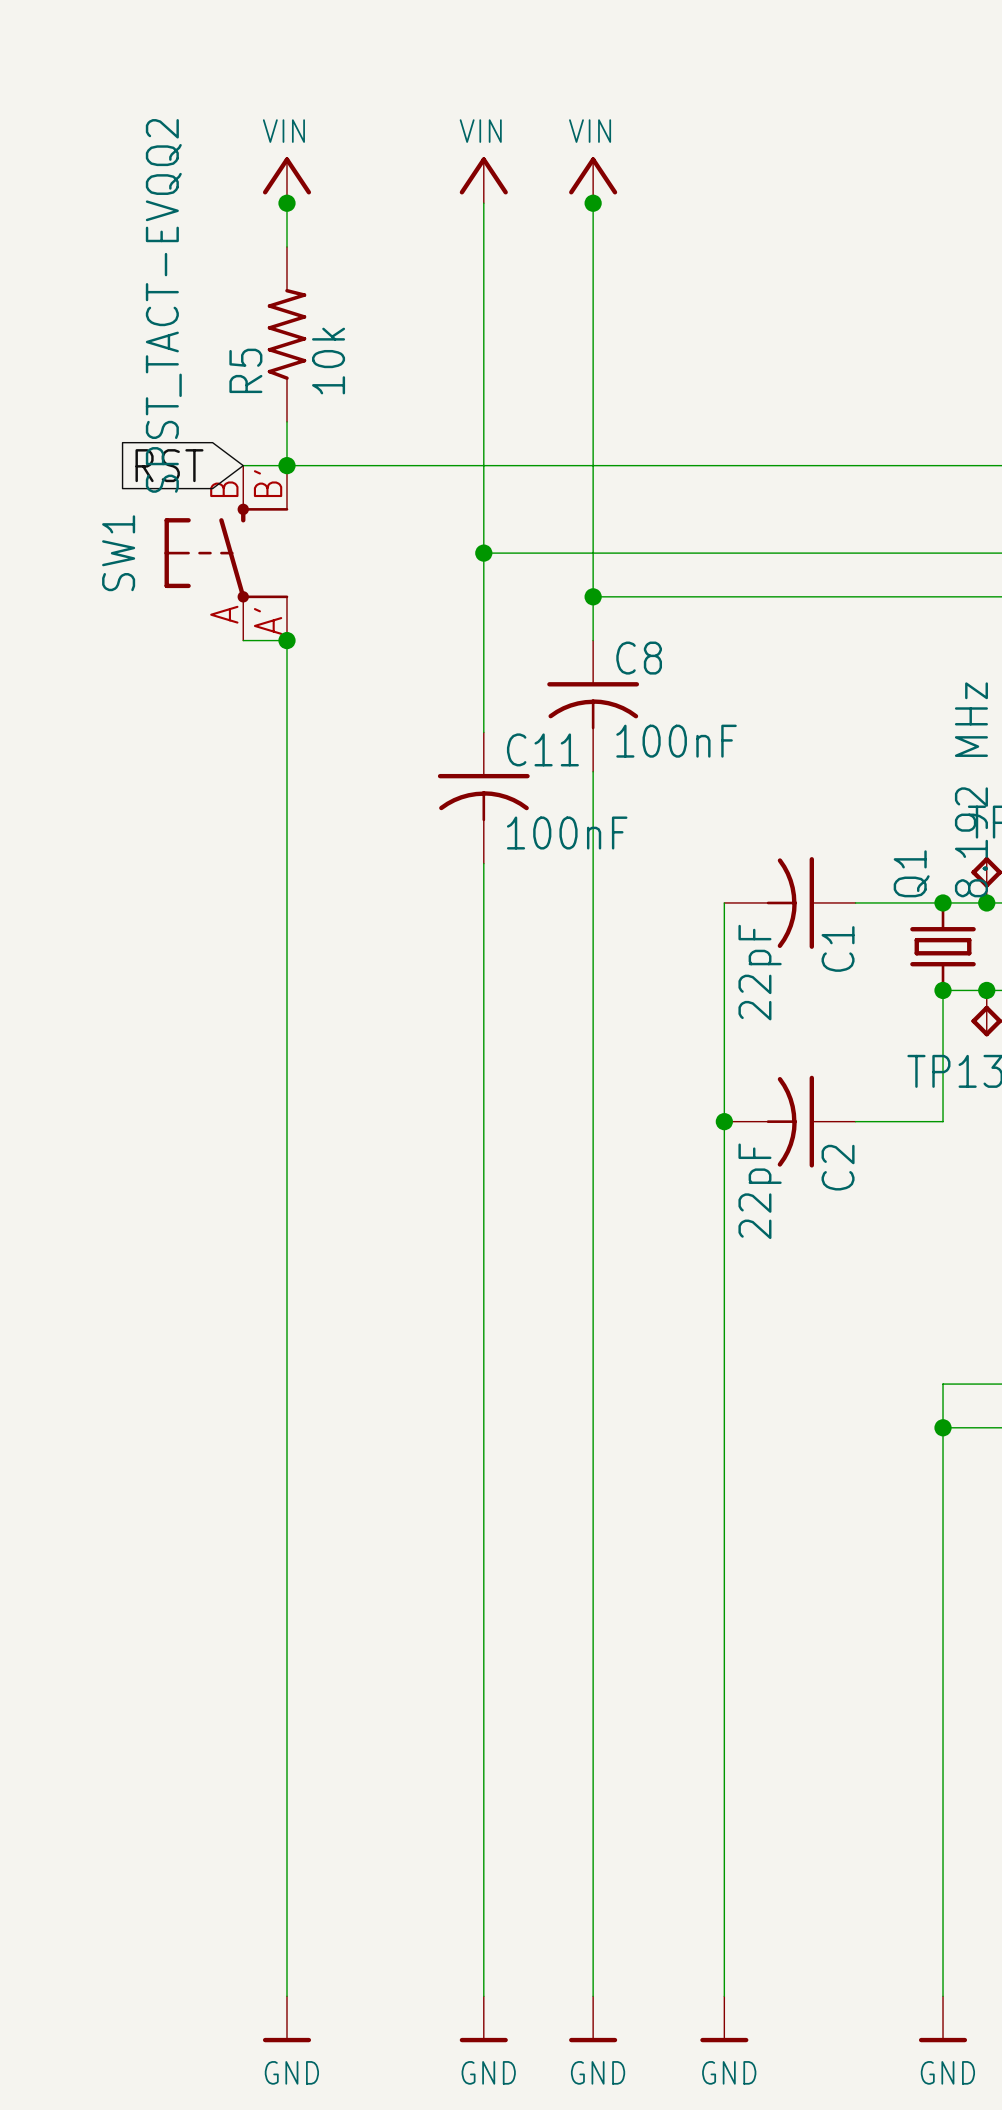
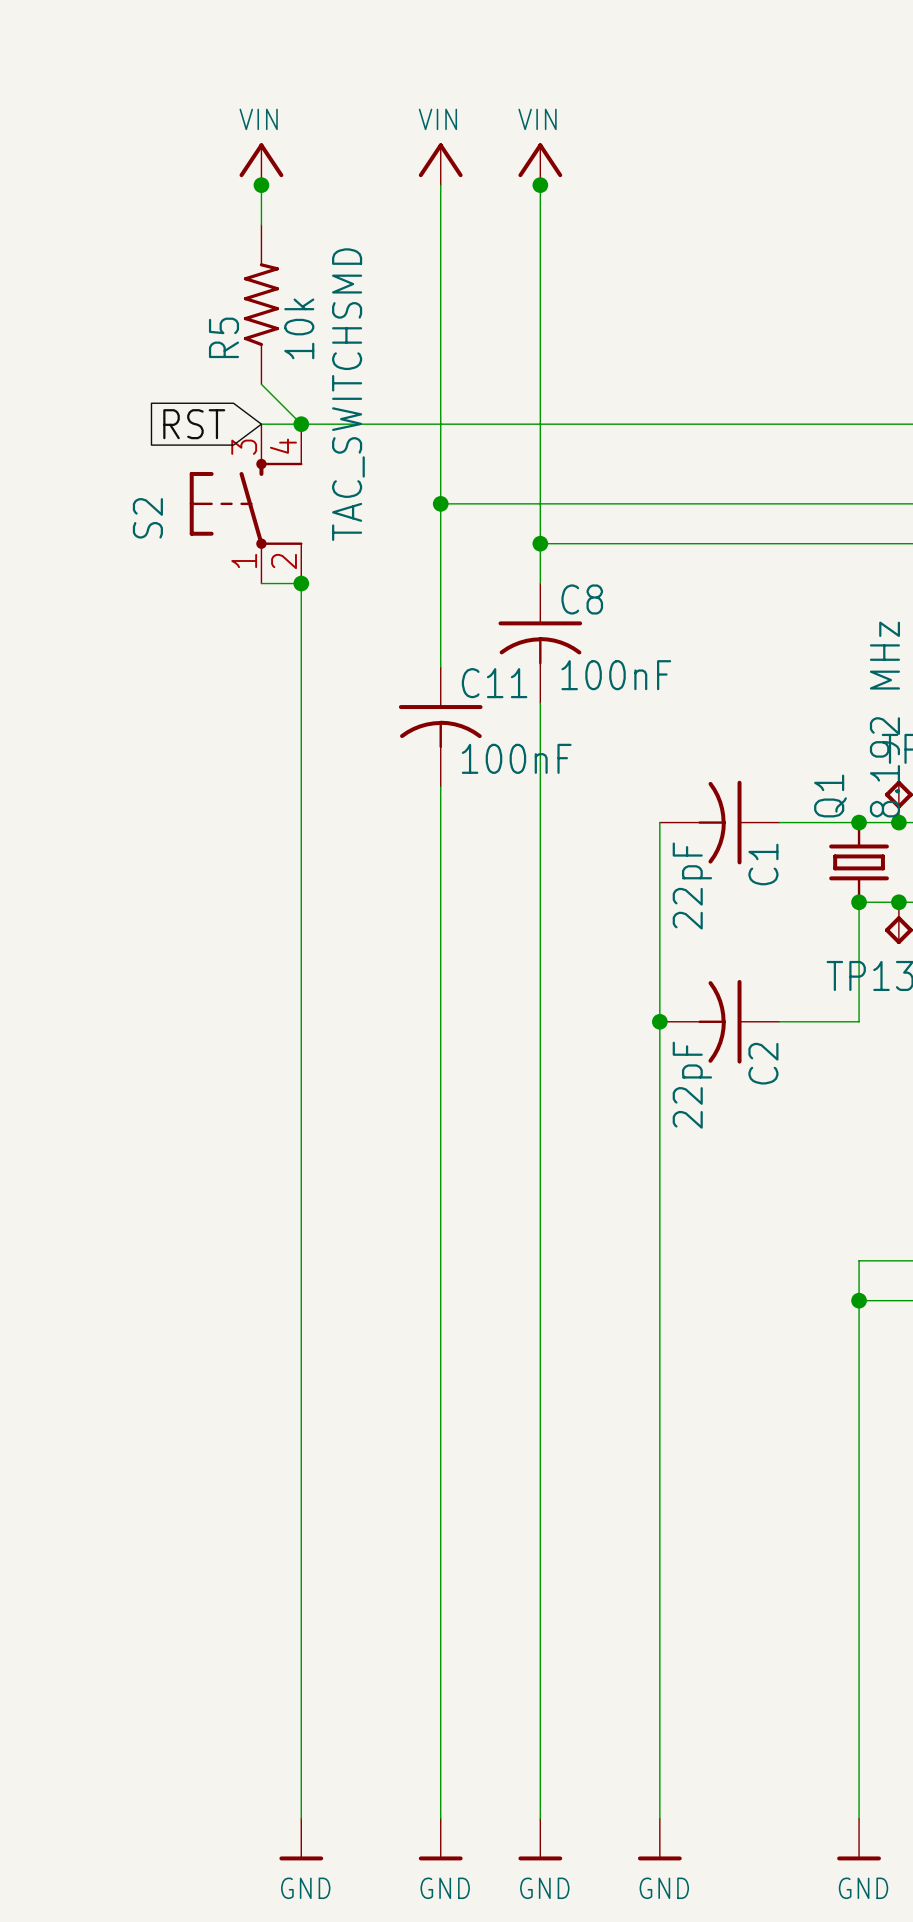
wire: (286, 421) (286, 465) (243, 465) -> (261, 384) (301, 424)
global label position: RST (169, 465) -> RST (194, 424)
junction position: (286, 465) -> (301, 424)
SW1: SPST_TACT-EVQQ2 (226, 553) -> none
S2: none -> TAC_SWITCHSMD (246, 503)
wire: (243, 640) (286, 640) (286, 1996) -> (261, 583) (301, 583) (301, 1818)
junction position: (286, 640) -> (301, 583)
power symbol position: GND (286, 2019) -> GND (301, 1839)

